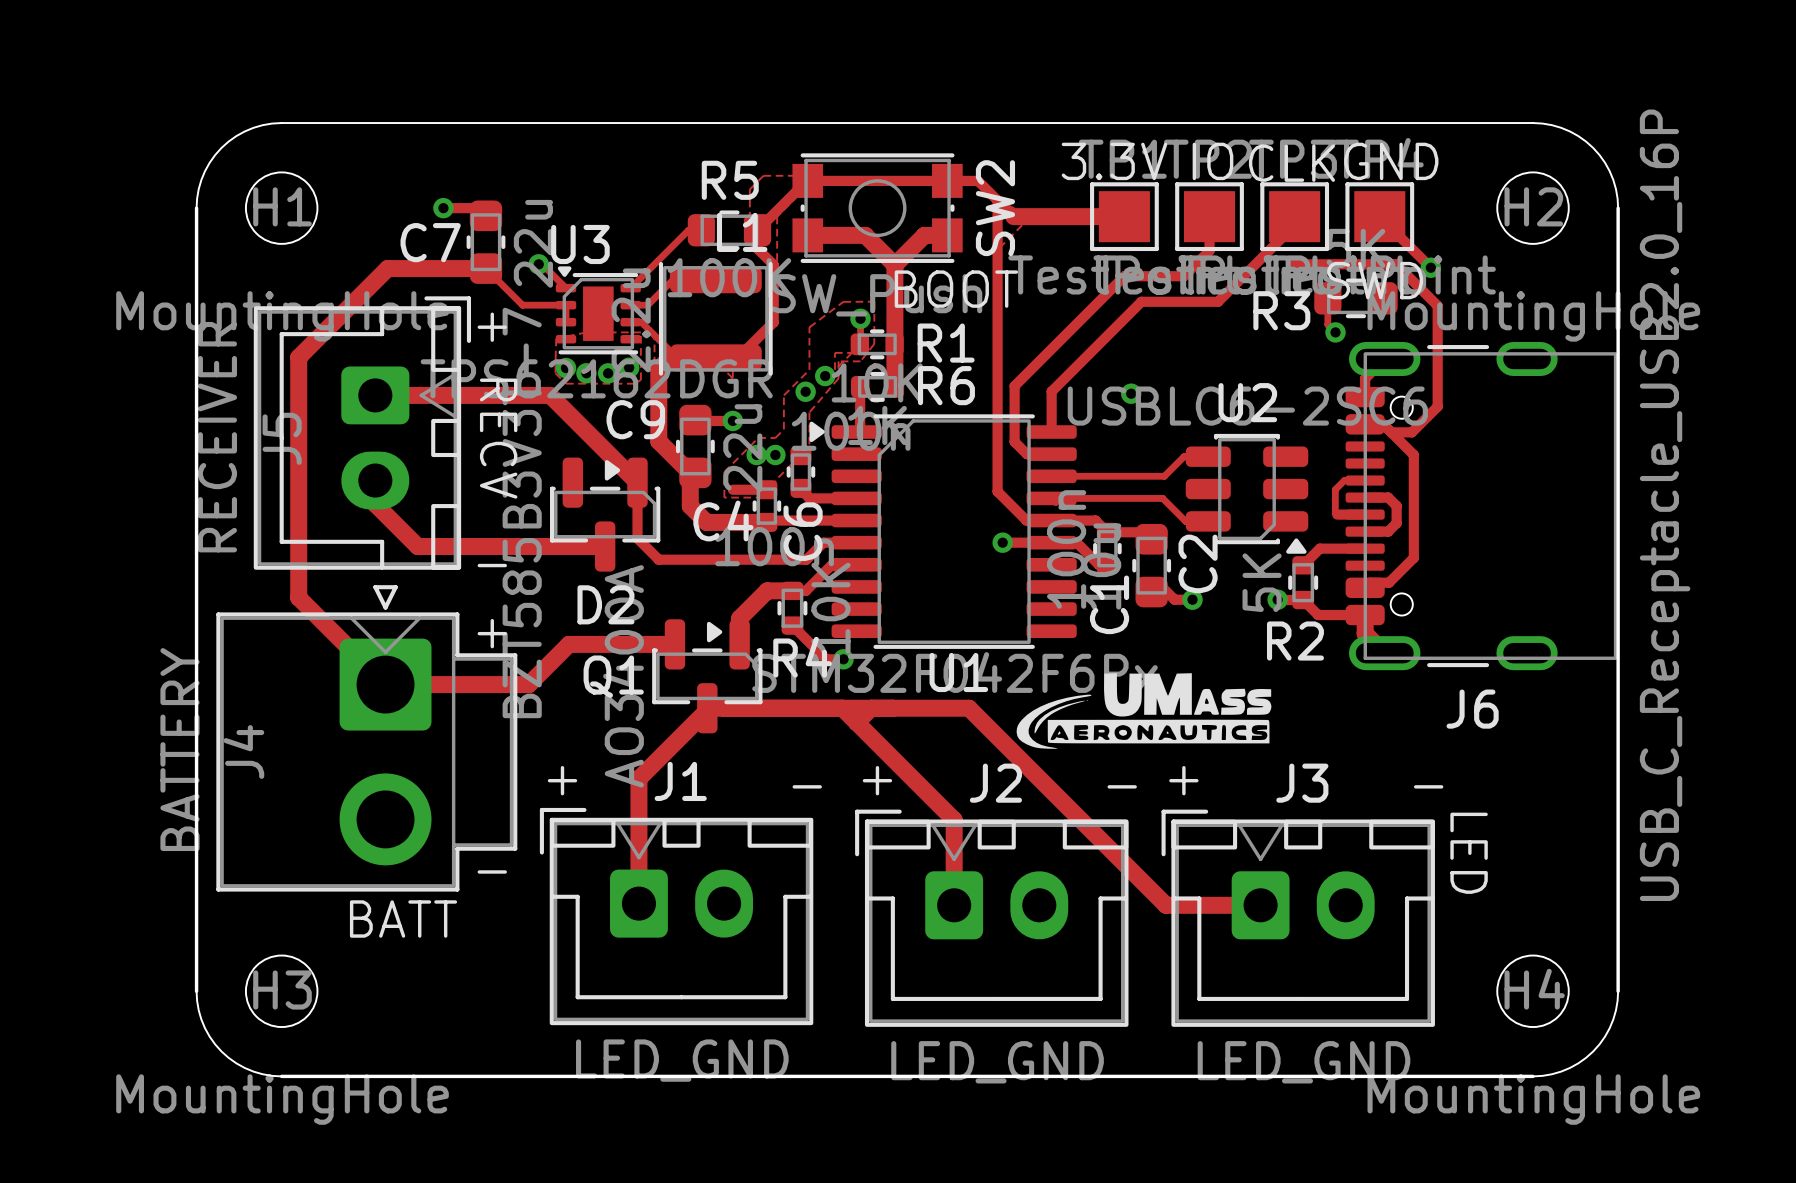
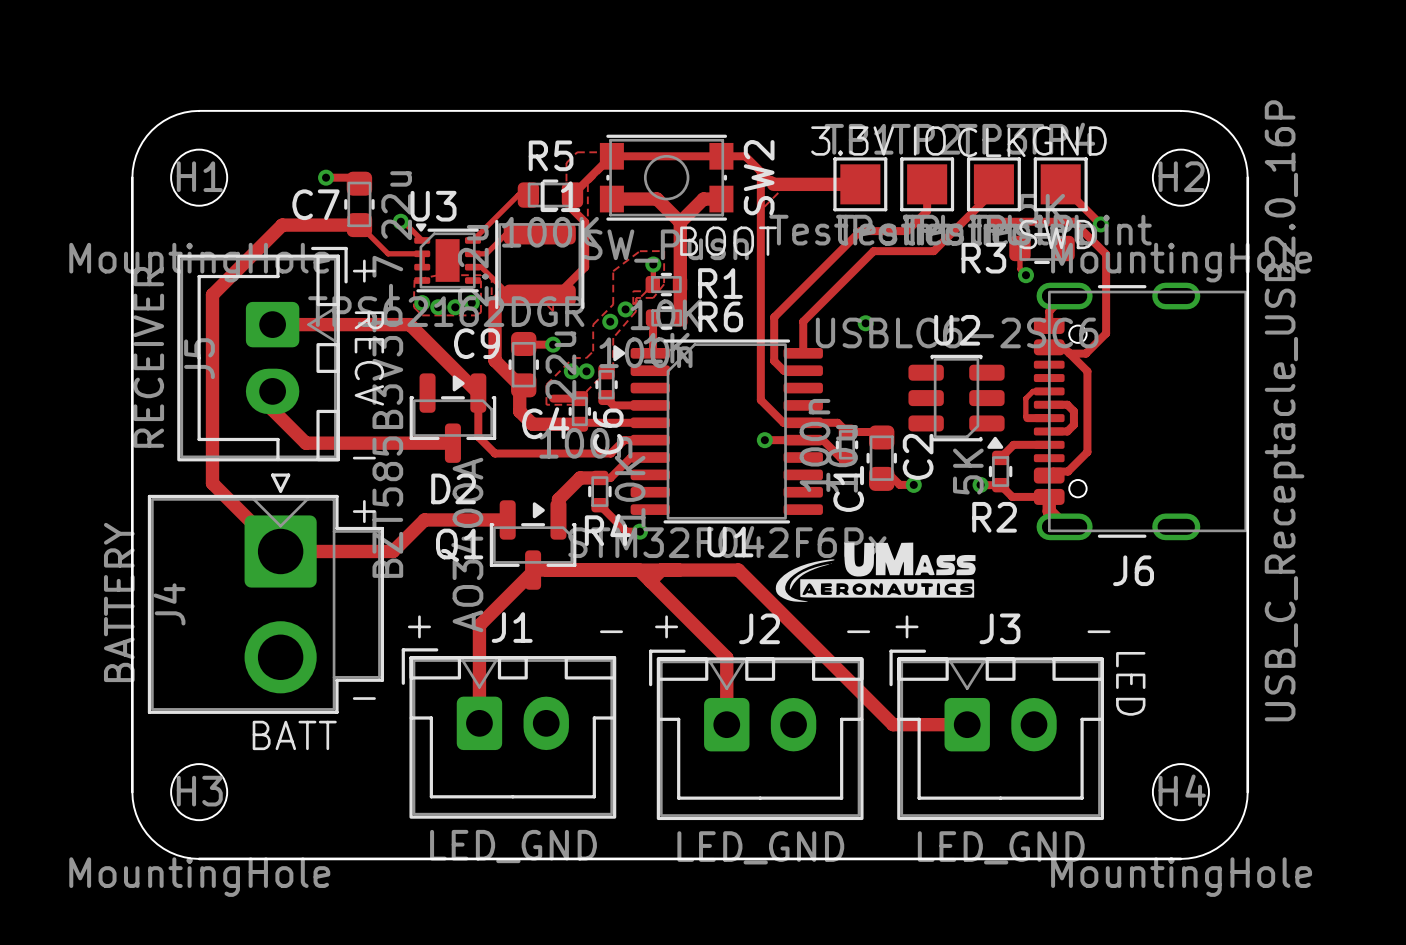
track: (1208, 456) (1184, 456) (1164, 476) (1051, 476) -> none
track: (1055, 502) (1051, 498) (1162, 498) (1185, 521) (1208, 521) -> none

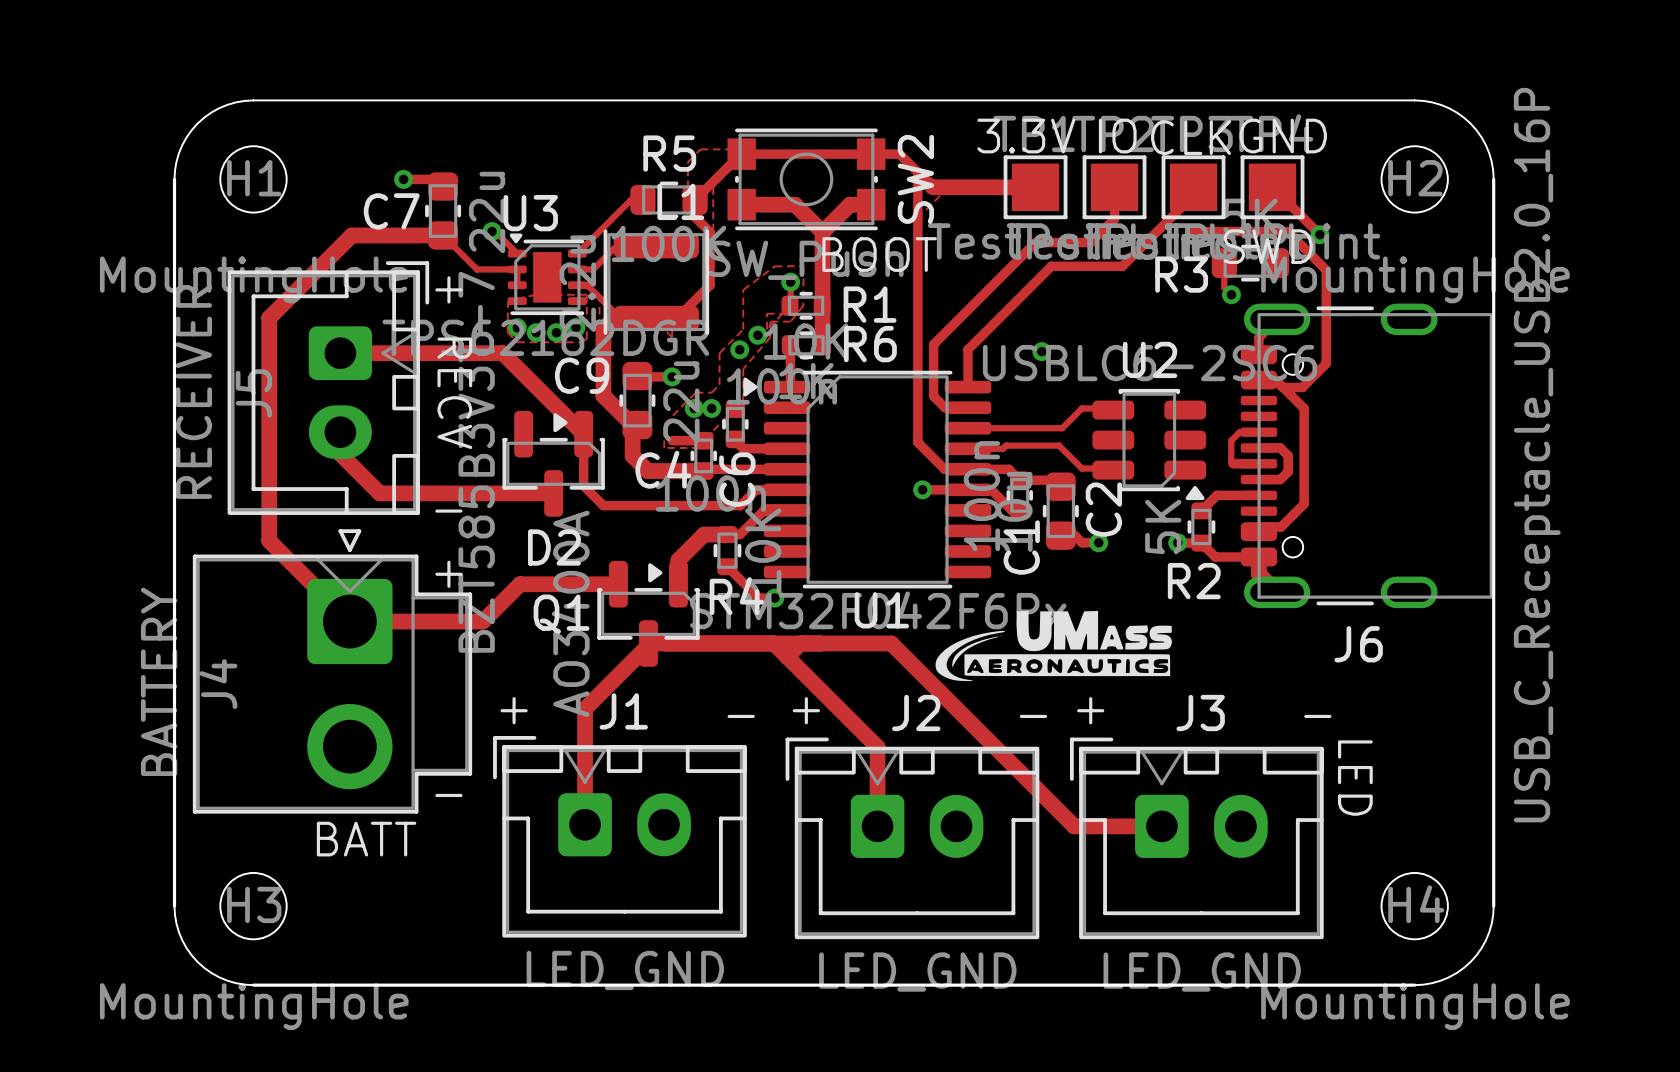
track: none -> (1113, 408) (1081, 408) (1062, 428) (967, 428)
track: none -> (967, 448) (1002, 448) (1006, 445) (1059, 445) (1081, 468) (1113, 468)

